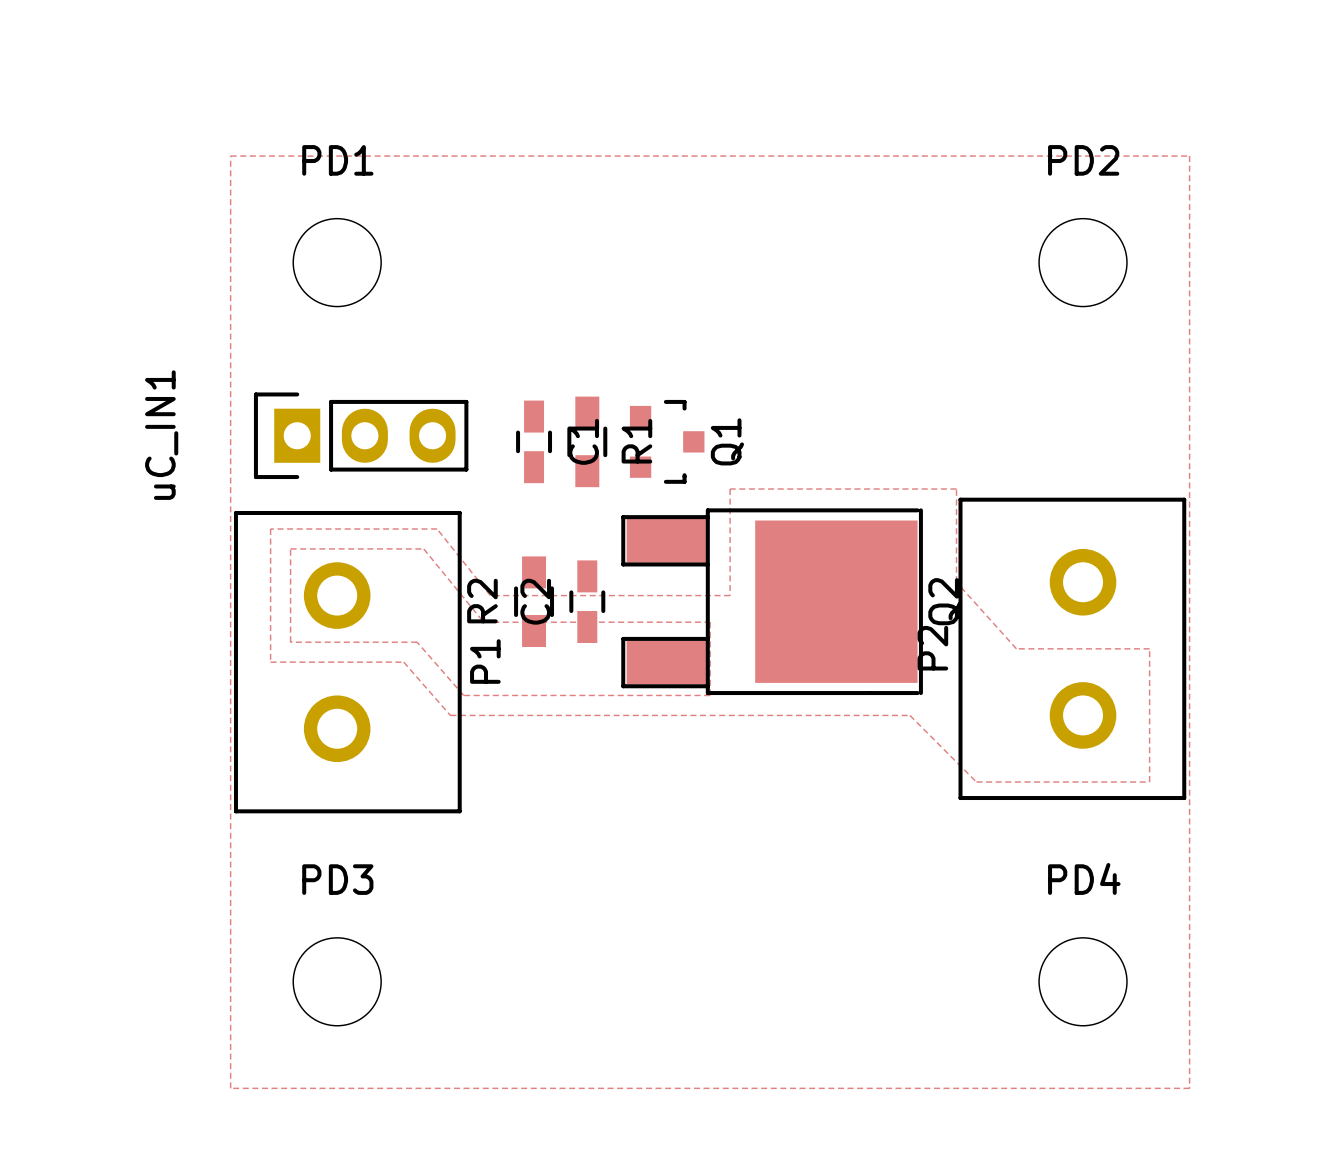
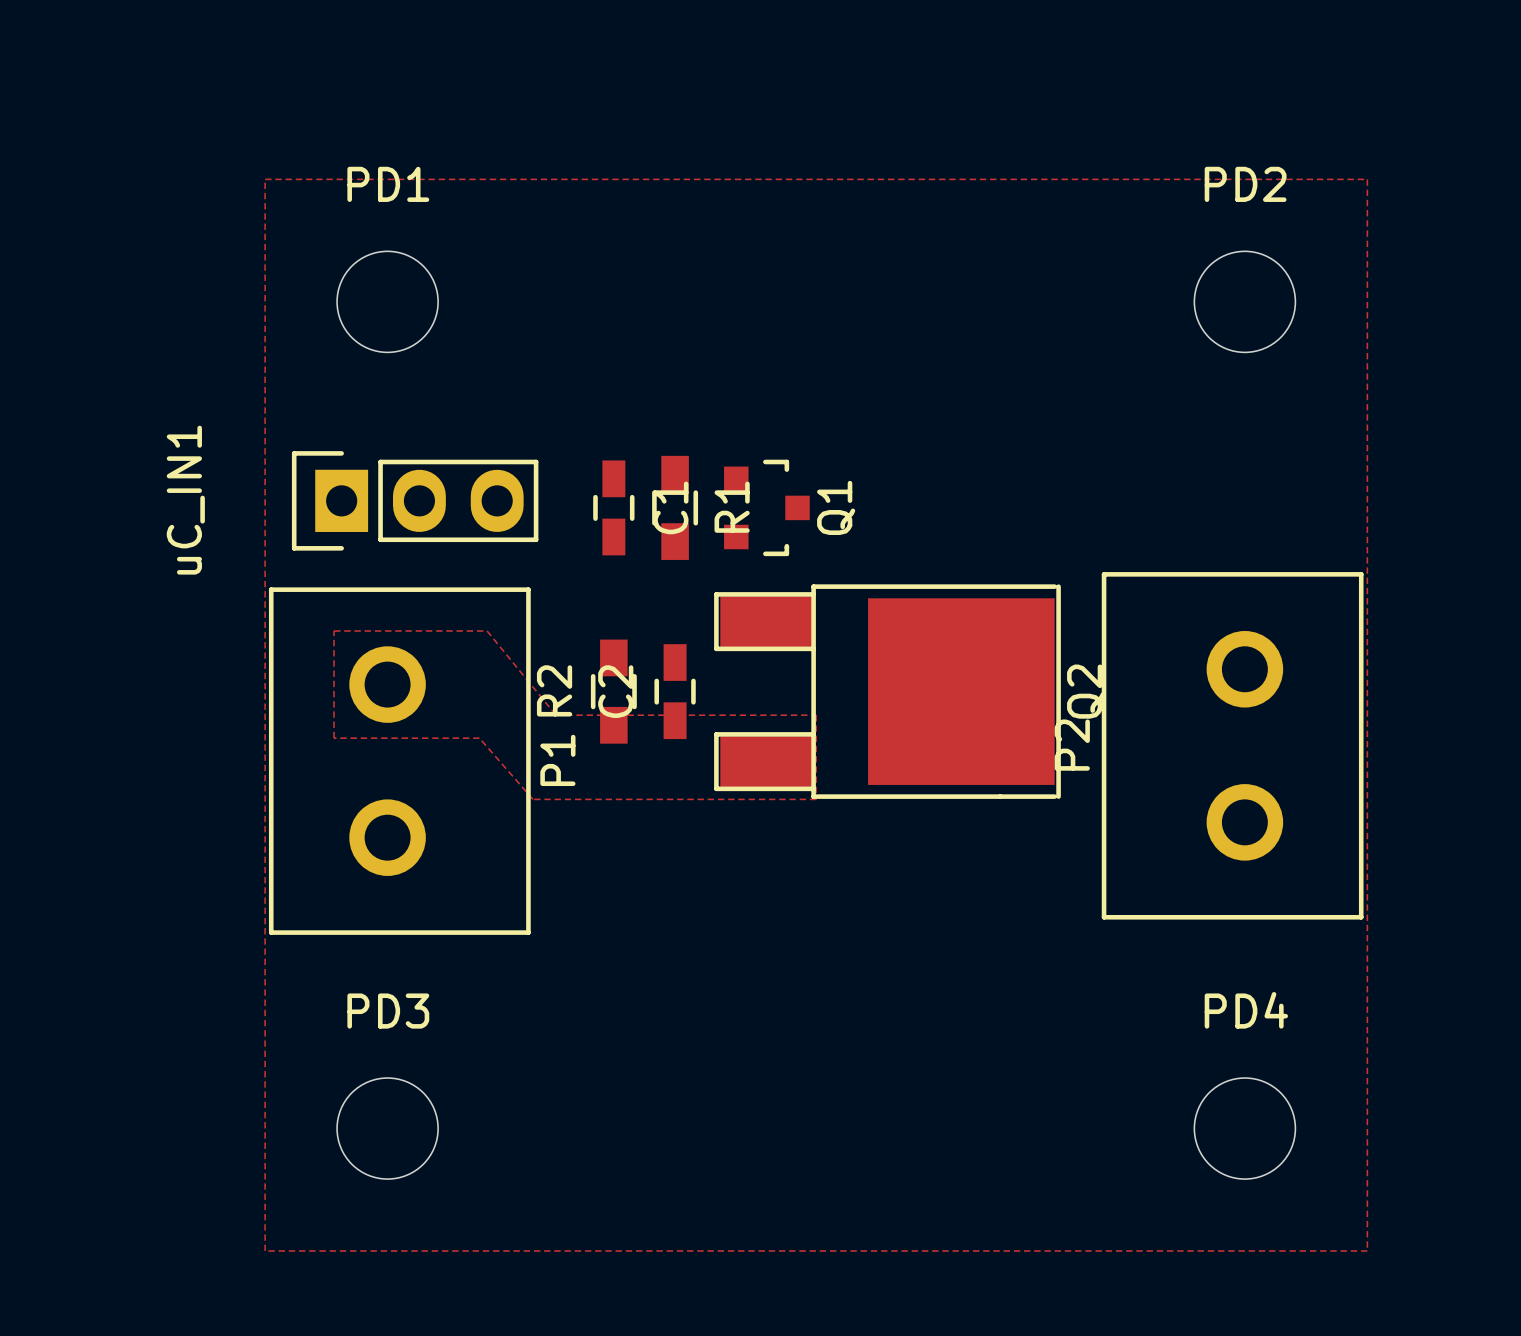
zone outline: (730, 489) (730, 595) (490, 595) (437, 528) (270, 528) (270, 662) (403, 662) (450, 715) (909, 715) (976, 782) (1149, 782) (1149, 648) (1016, 648) (956, 582) (956, 489) (730, 489) -> none

